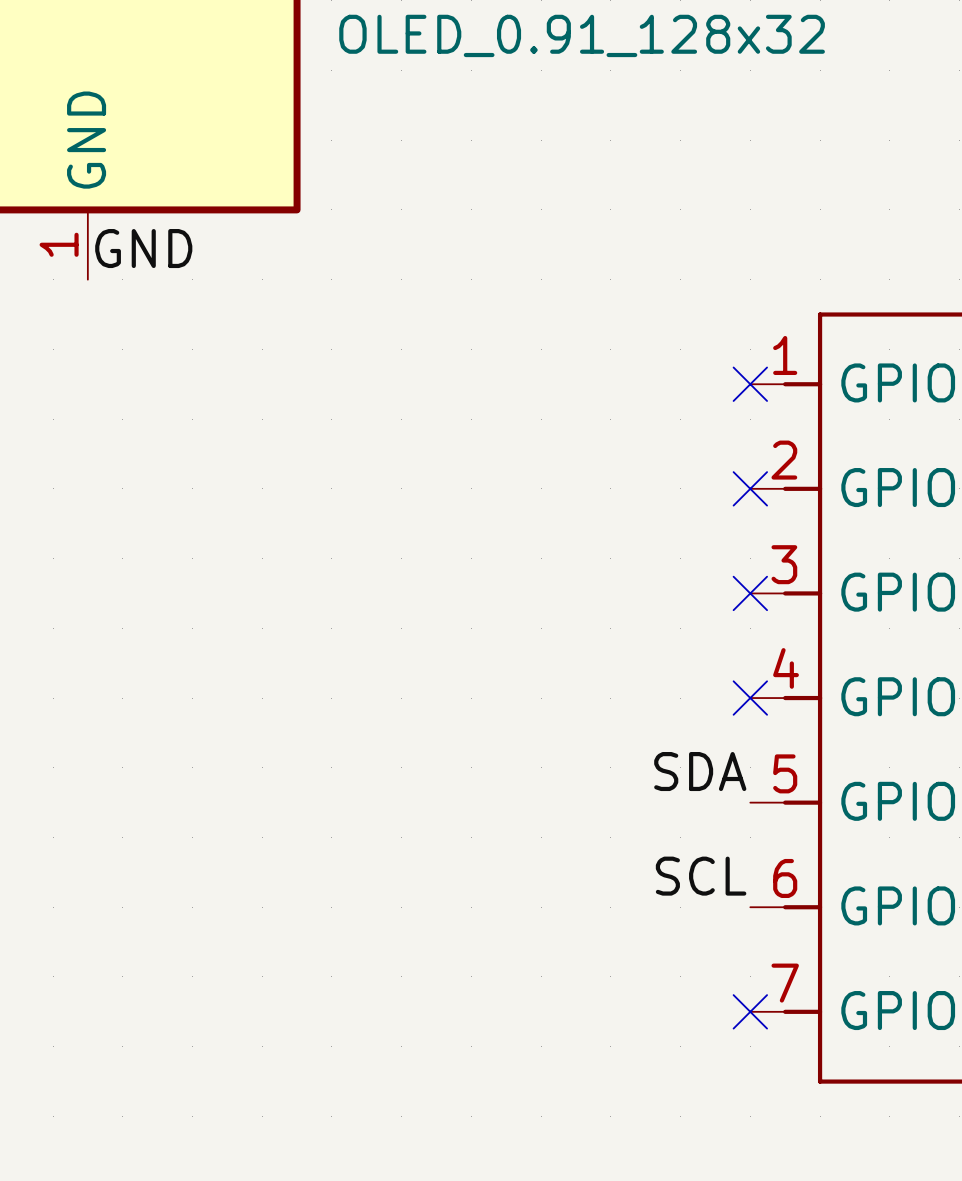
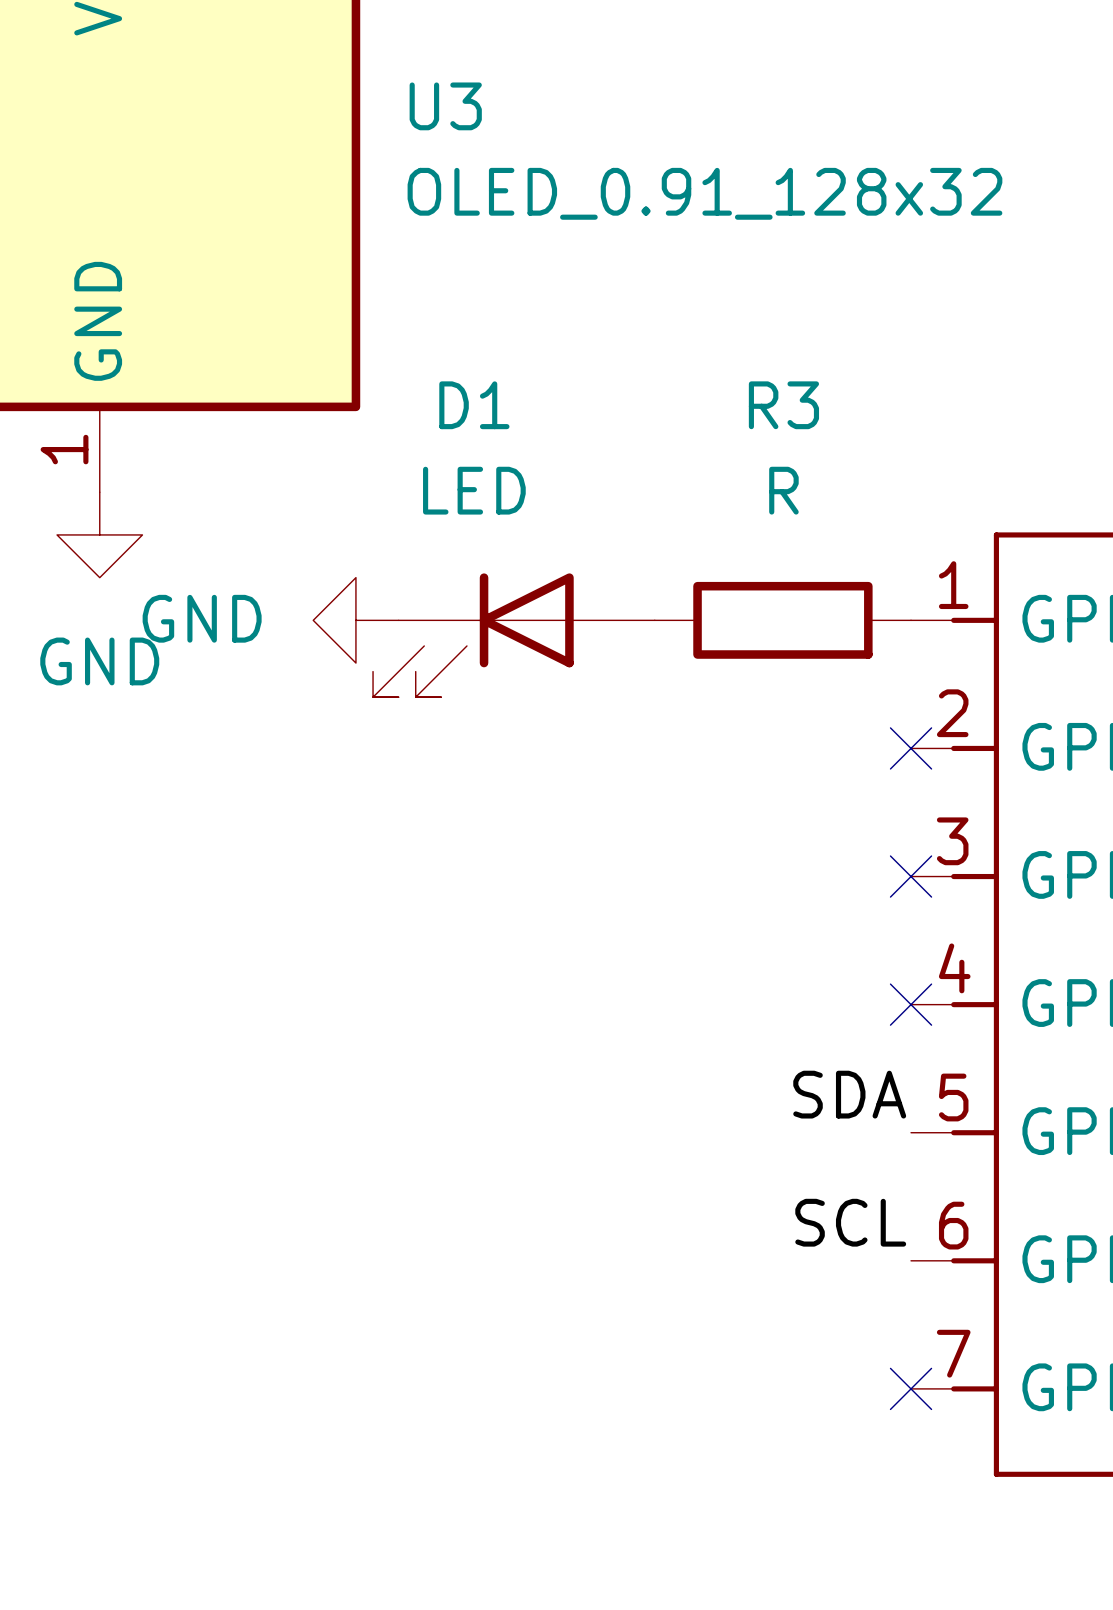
label: GND (143, 248) -> none
power symbol: none -> GND (99, 534)
power symbol: none -> GND (355, 620)
R3: none -> R (782, 620)
no-connect mark: (750, 384) -> none
D1: none -> LED (513, 635)

